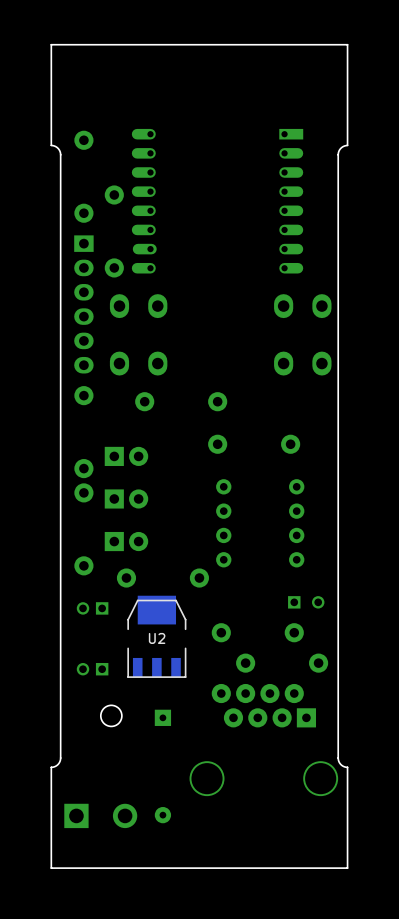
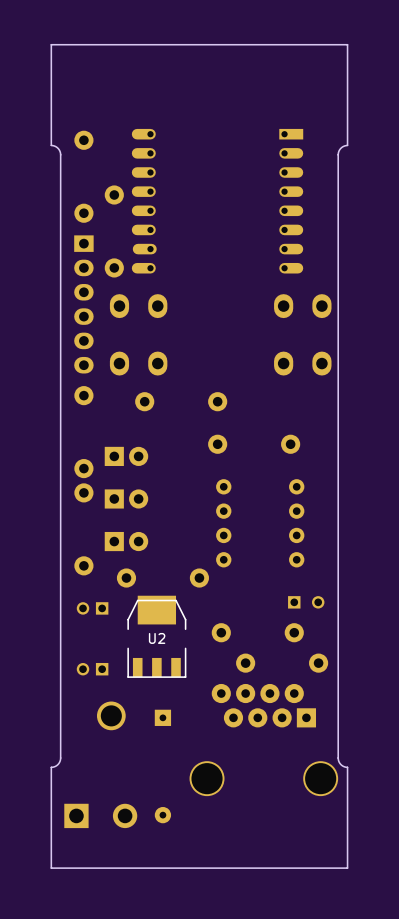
round board edge: [100, 704, 123, 728] -> none
part: none -> (111, 715)

